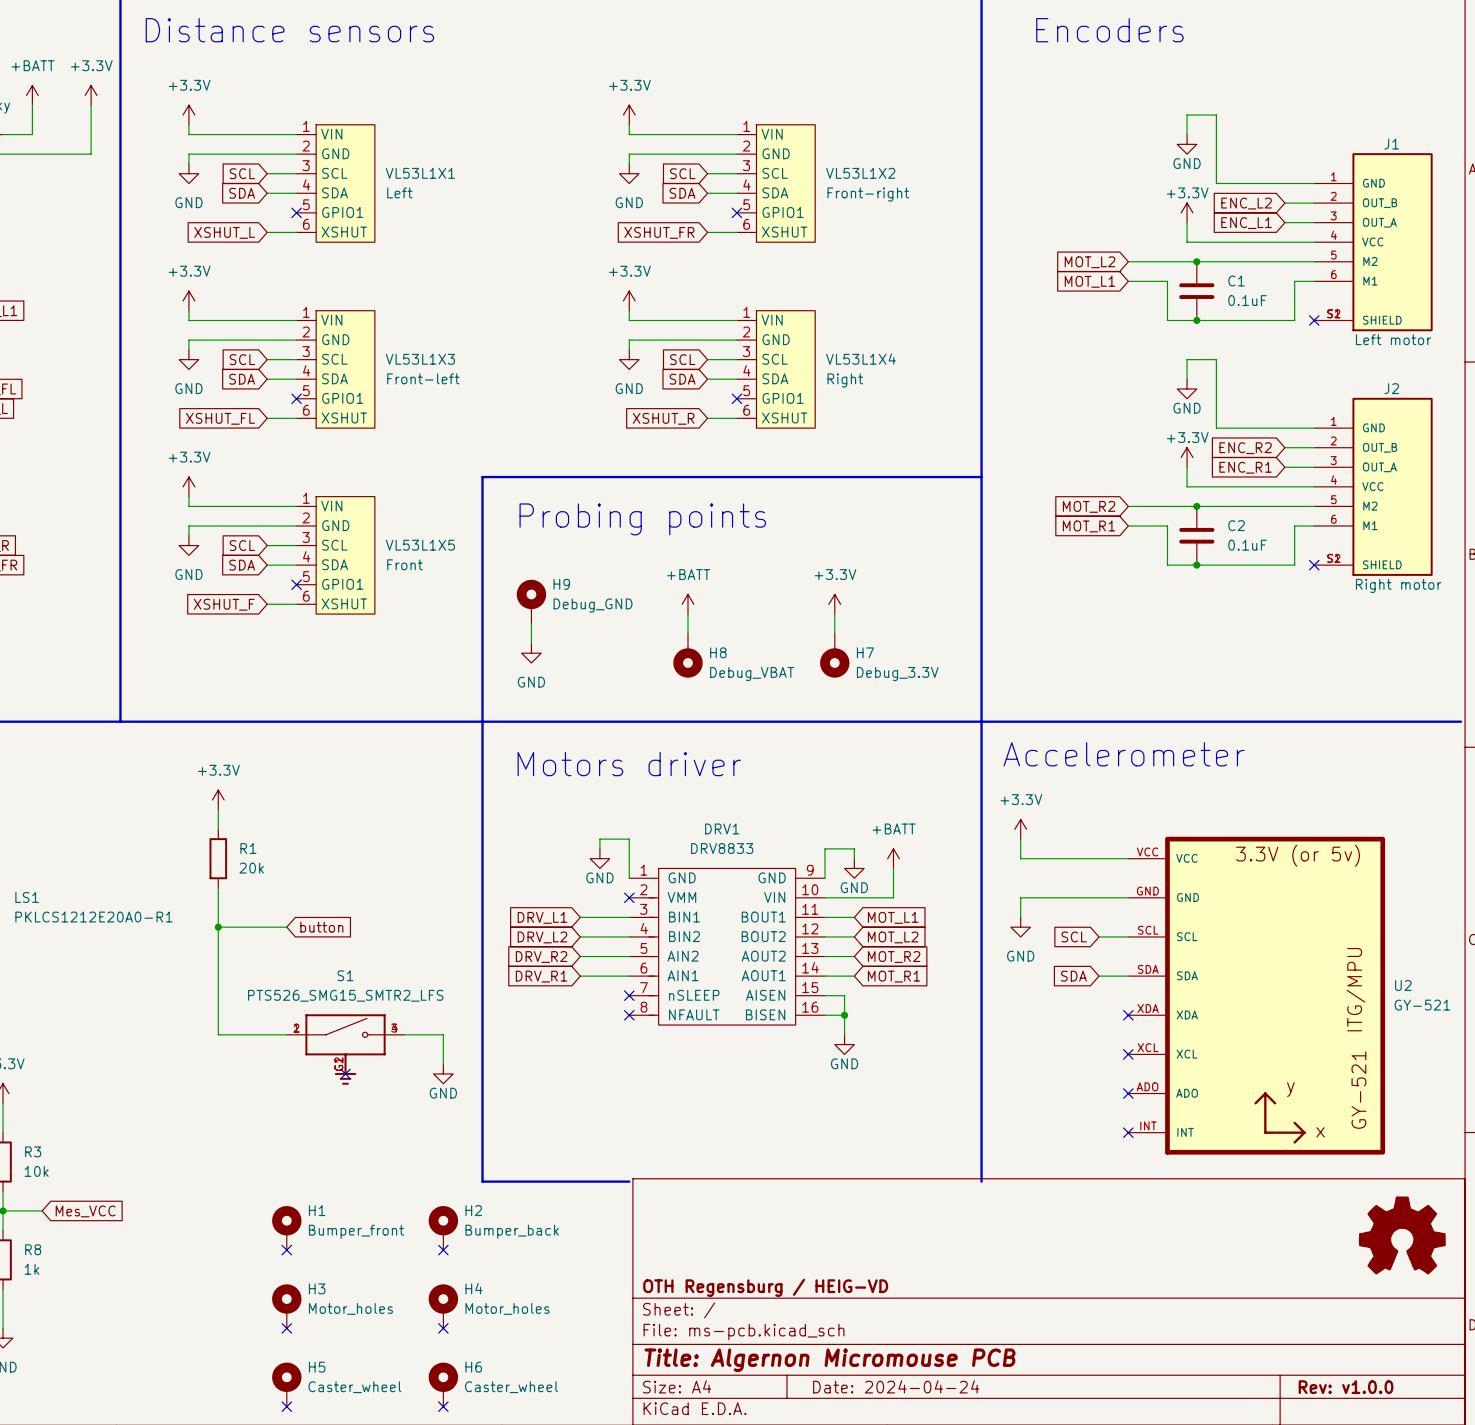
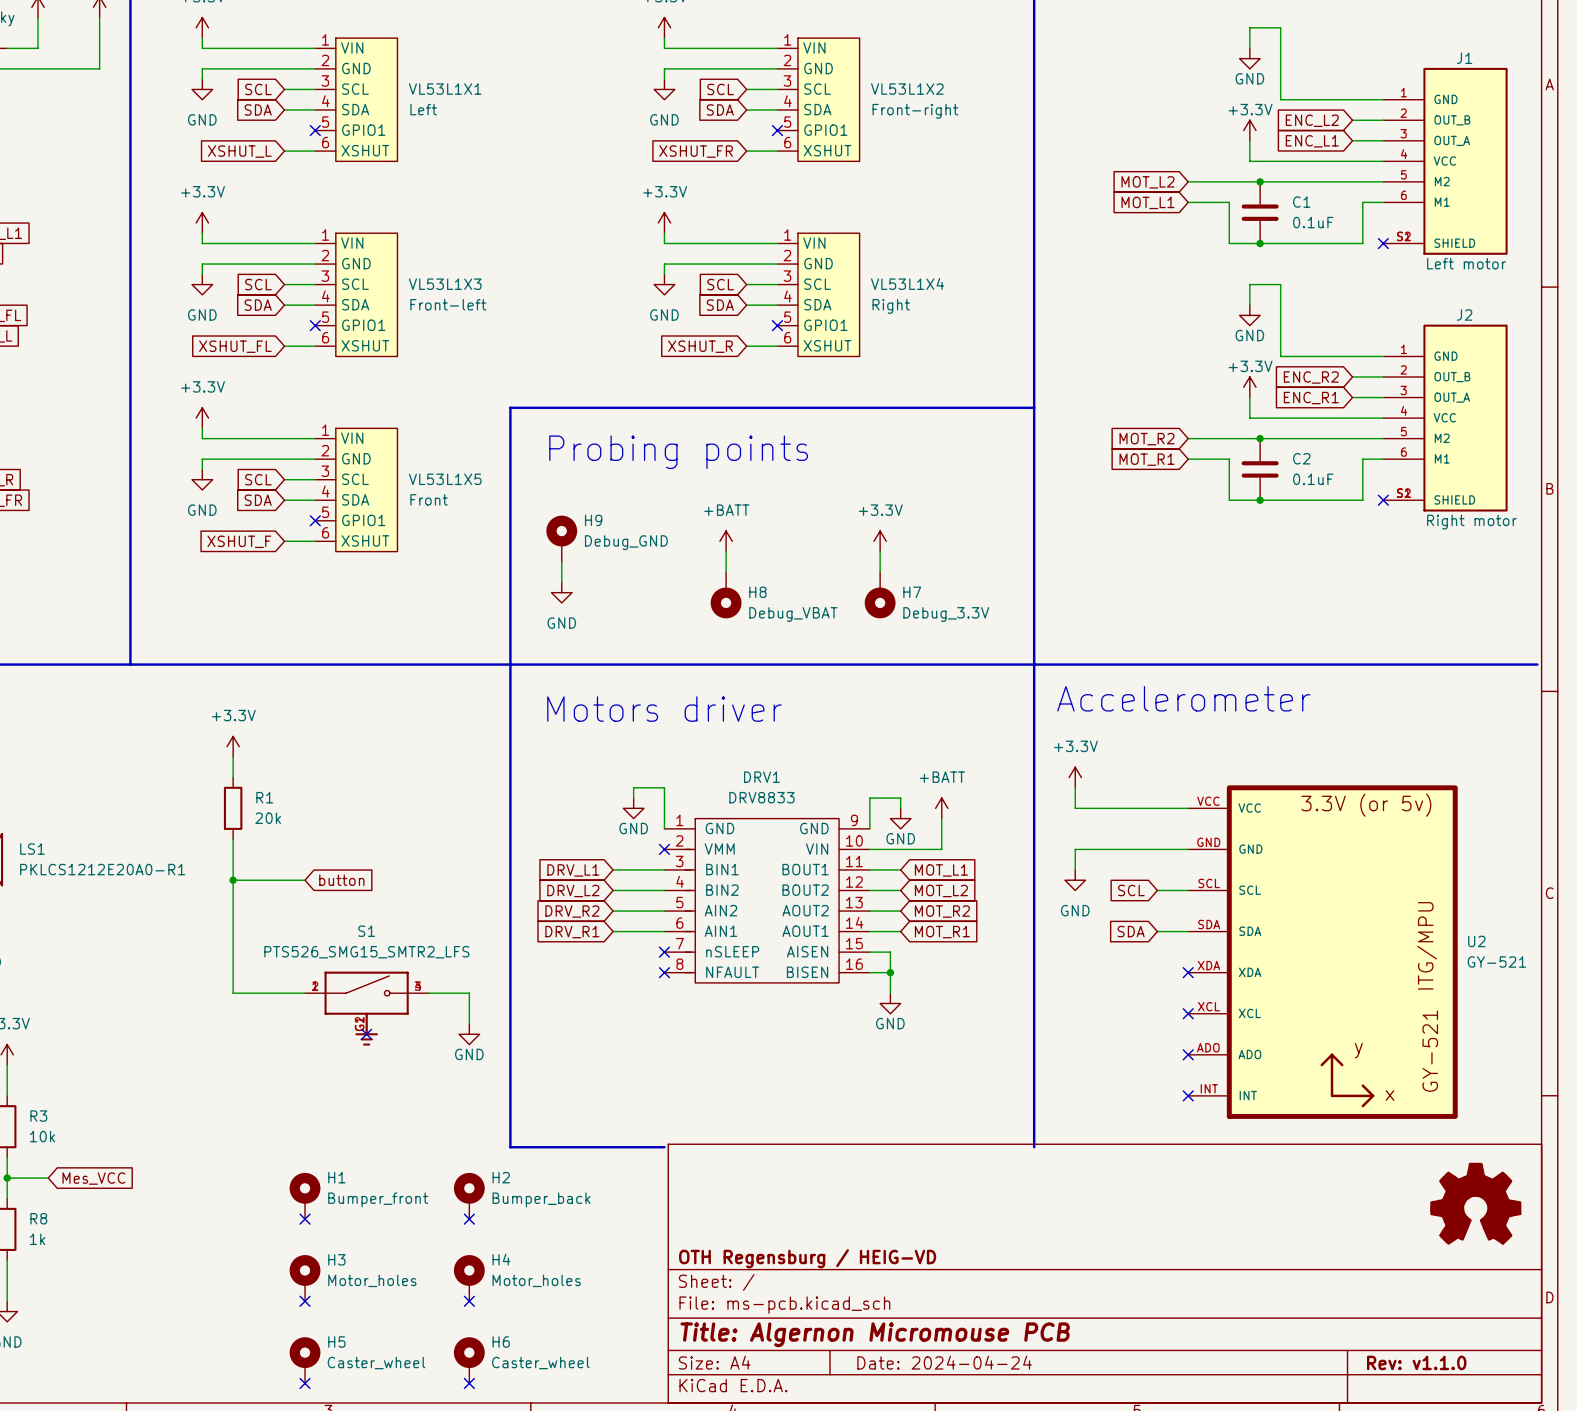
title block: Rev: v1.0.0 (1346, 1387) -> Rev: v1.1.0 (1416, 1362)

